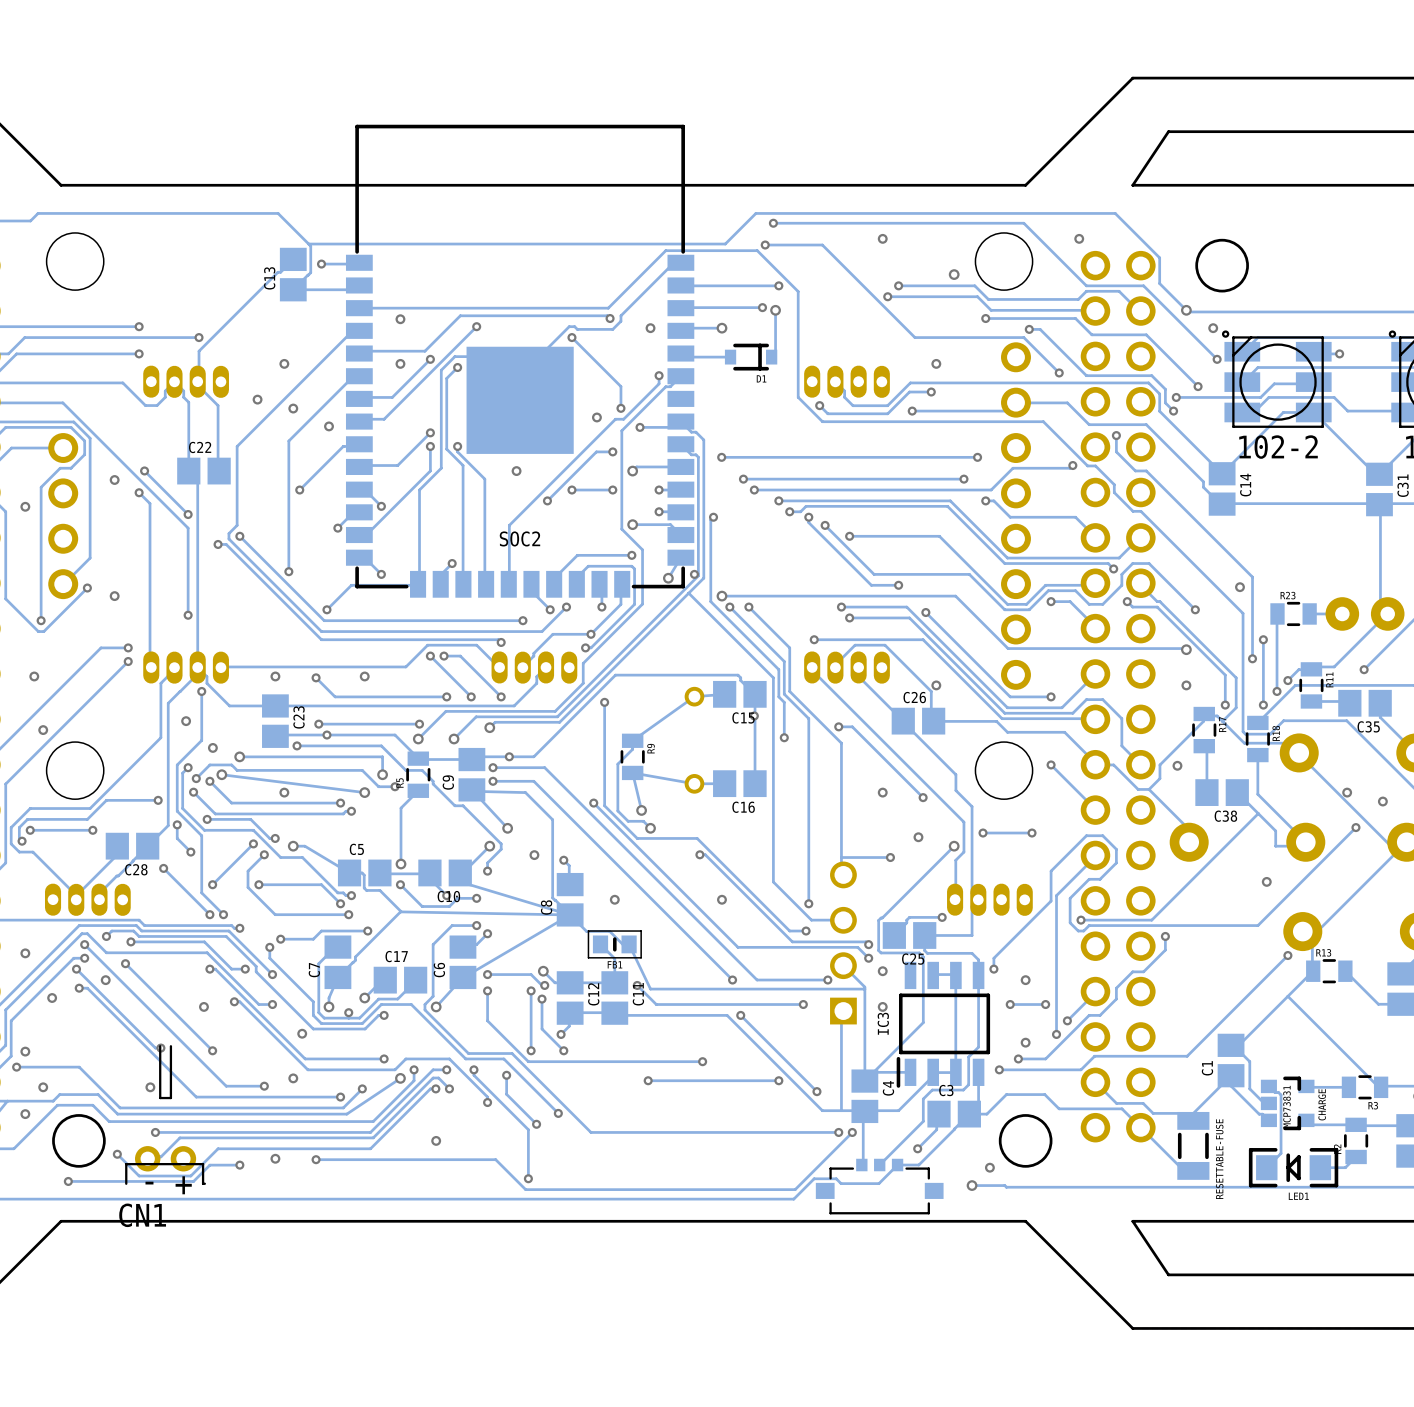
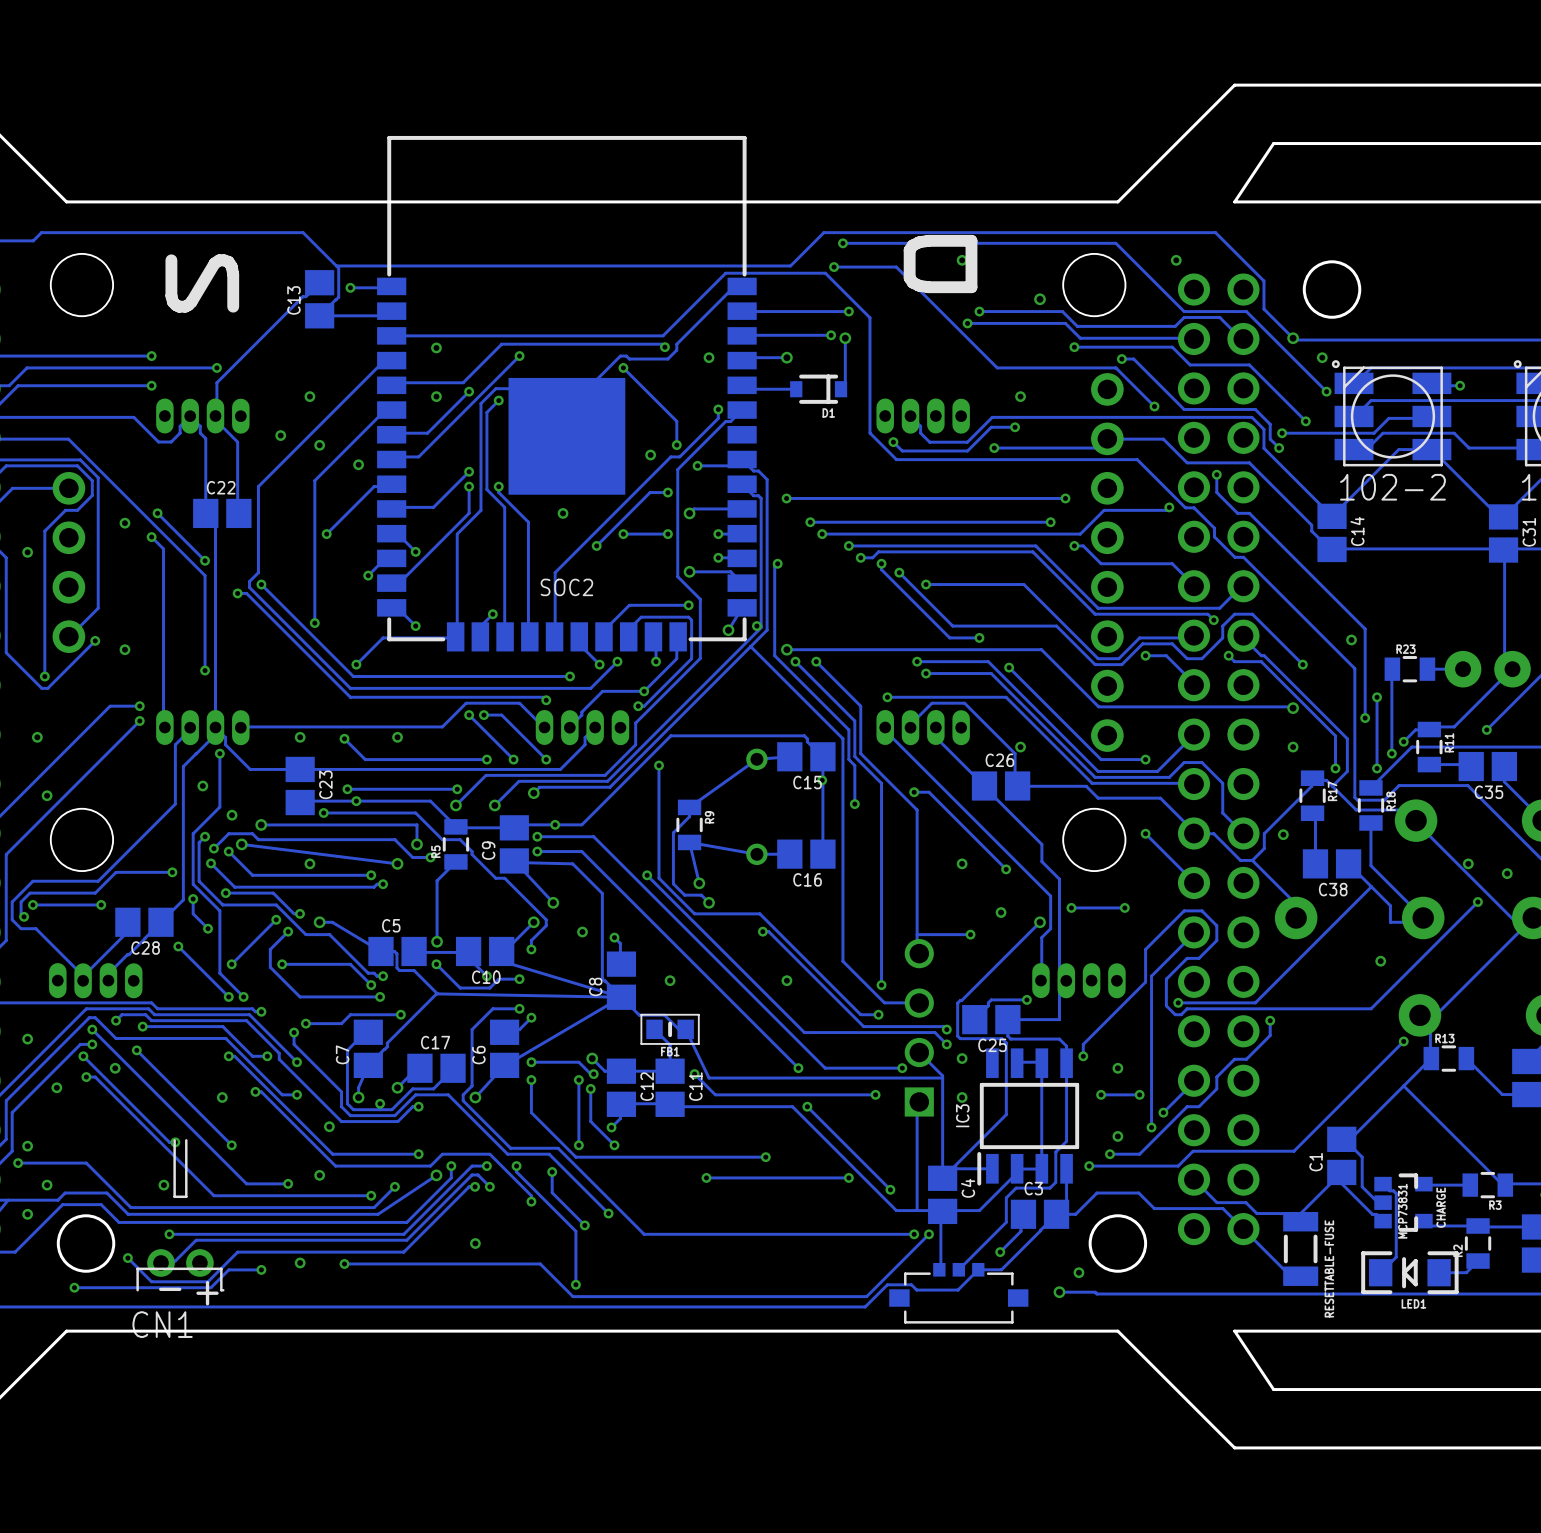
drawing: none -> [903, 234, 978, 294]
drawing: none -> [165, 254, 240, 313]

